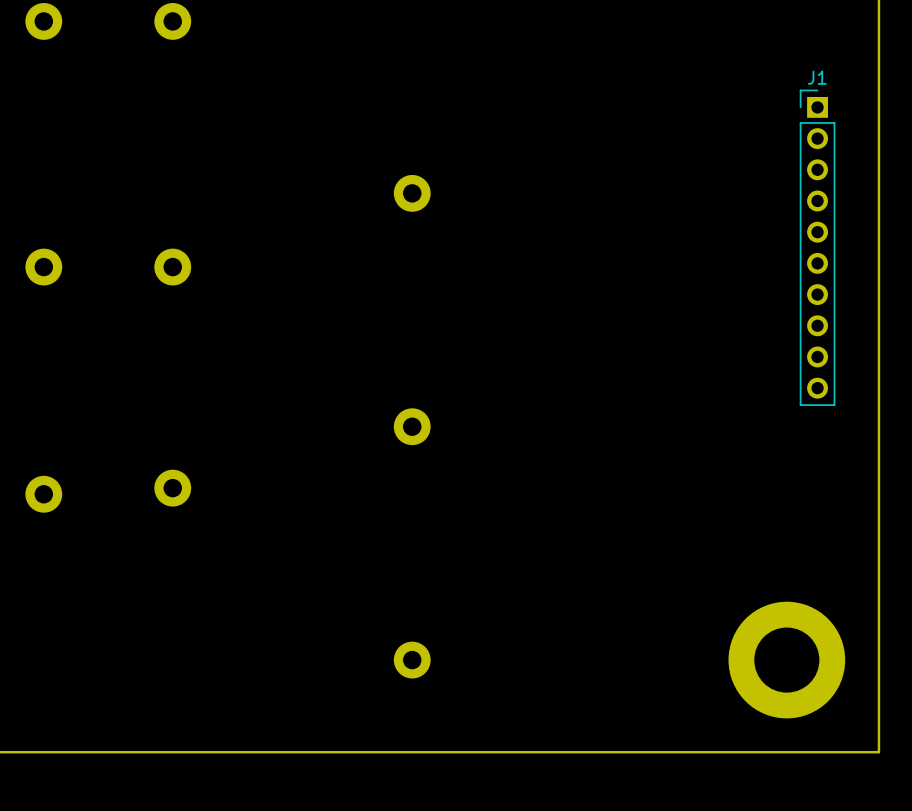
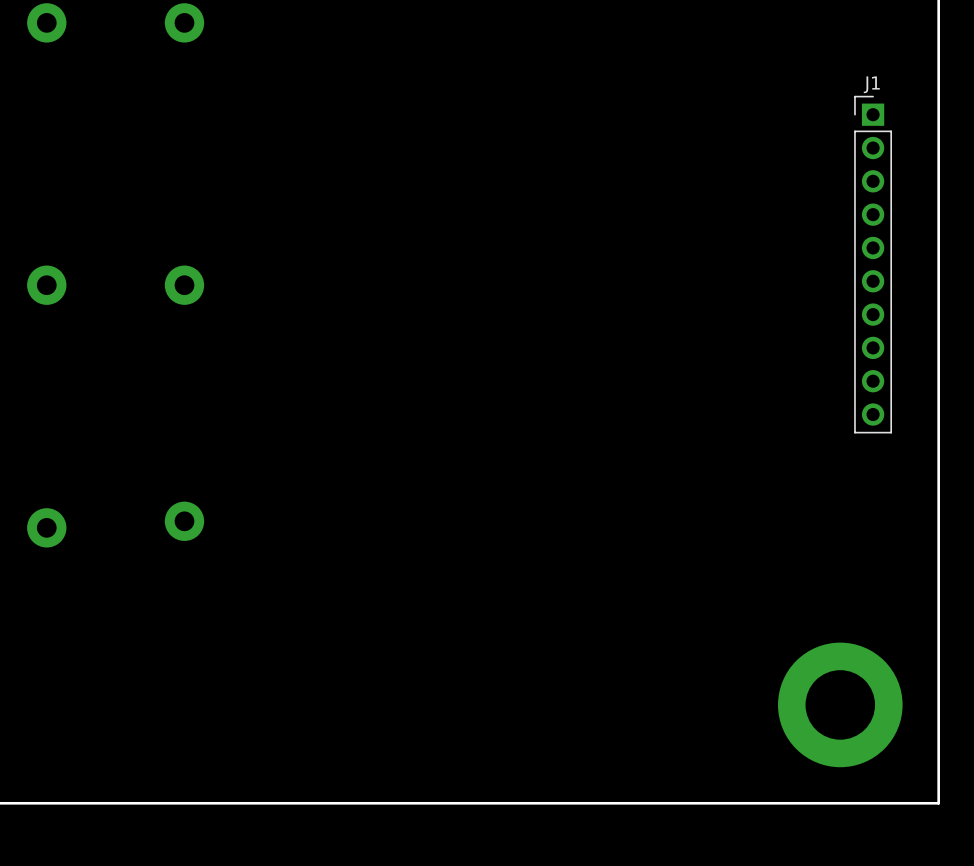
part: (412, 193) -> none
part: (412, 426) -> none
part: (412, 660) -> none

